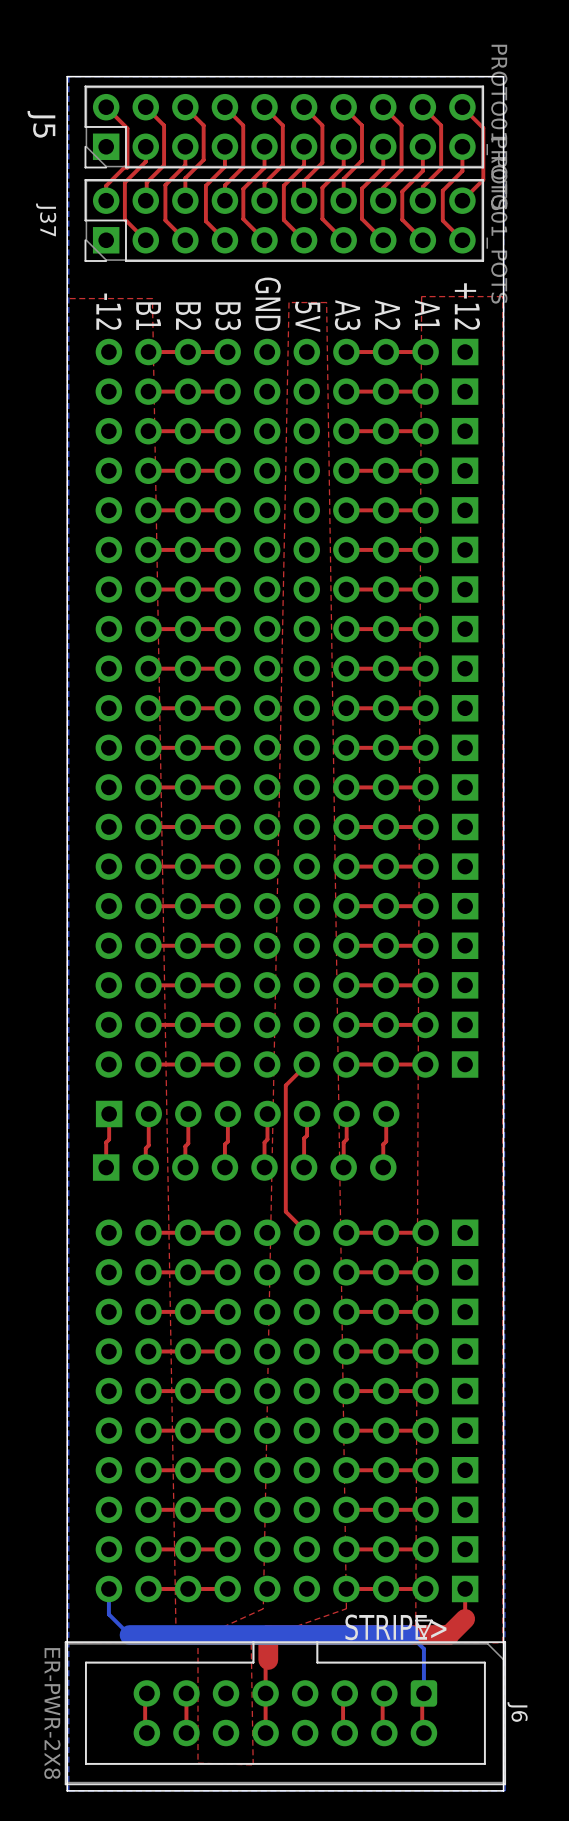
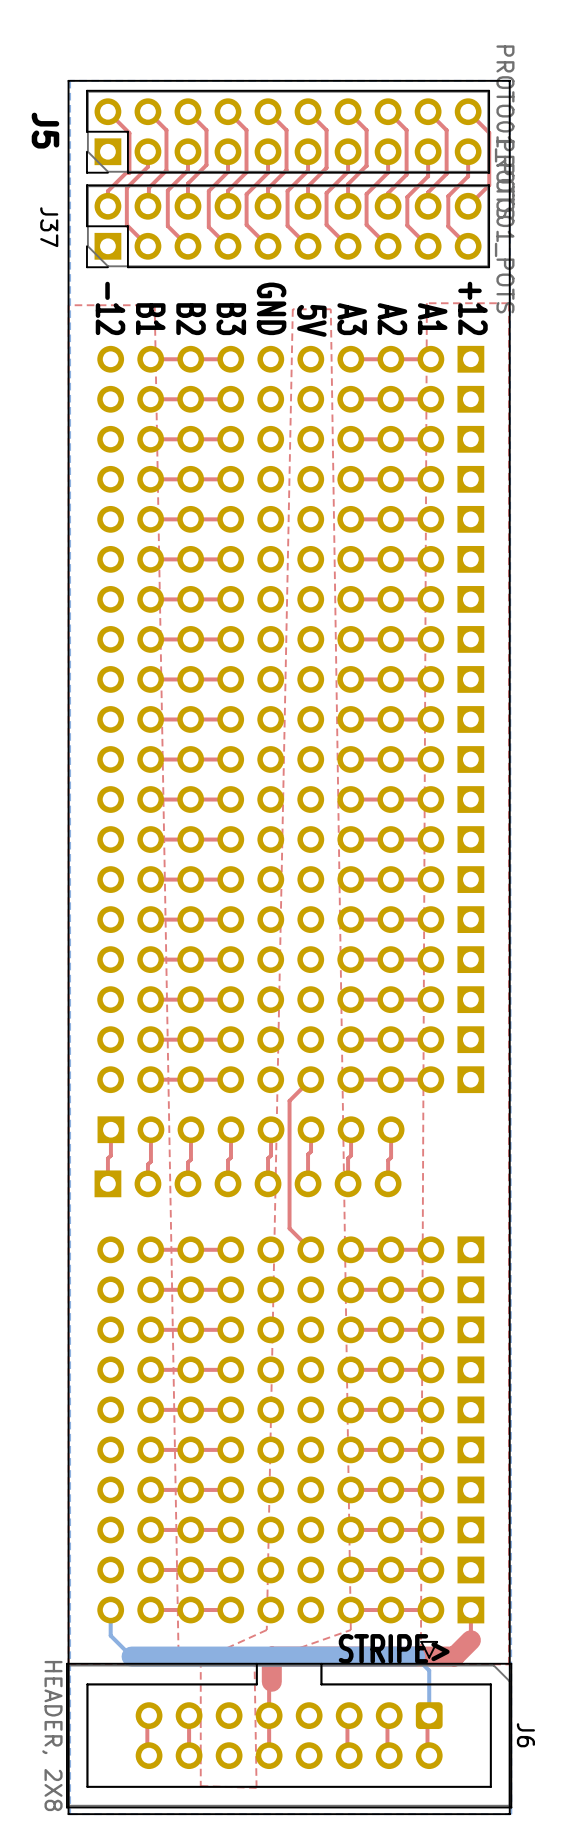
J6 value: ER-PWR-2X8 (52, 1713) -> HEADER, 2X8 (52, 1736)

